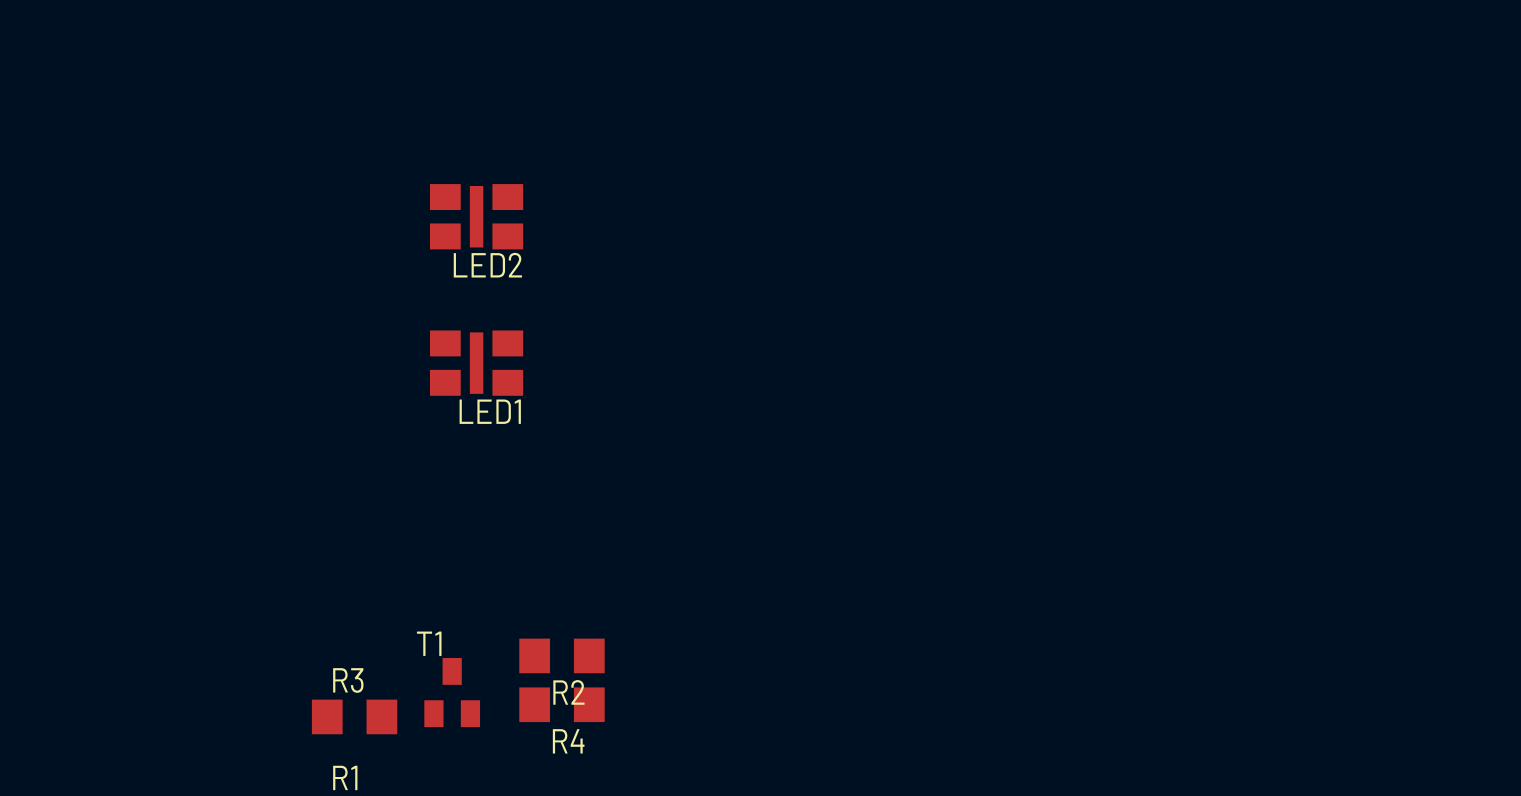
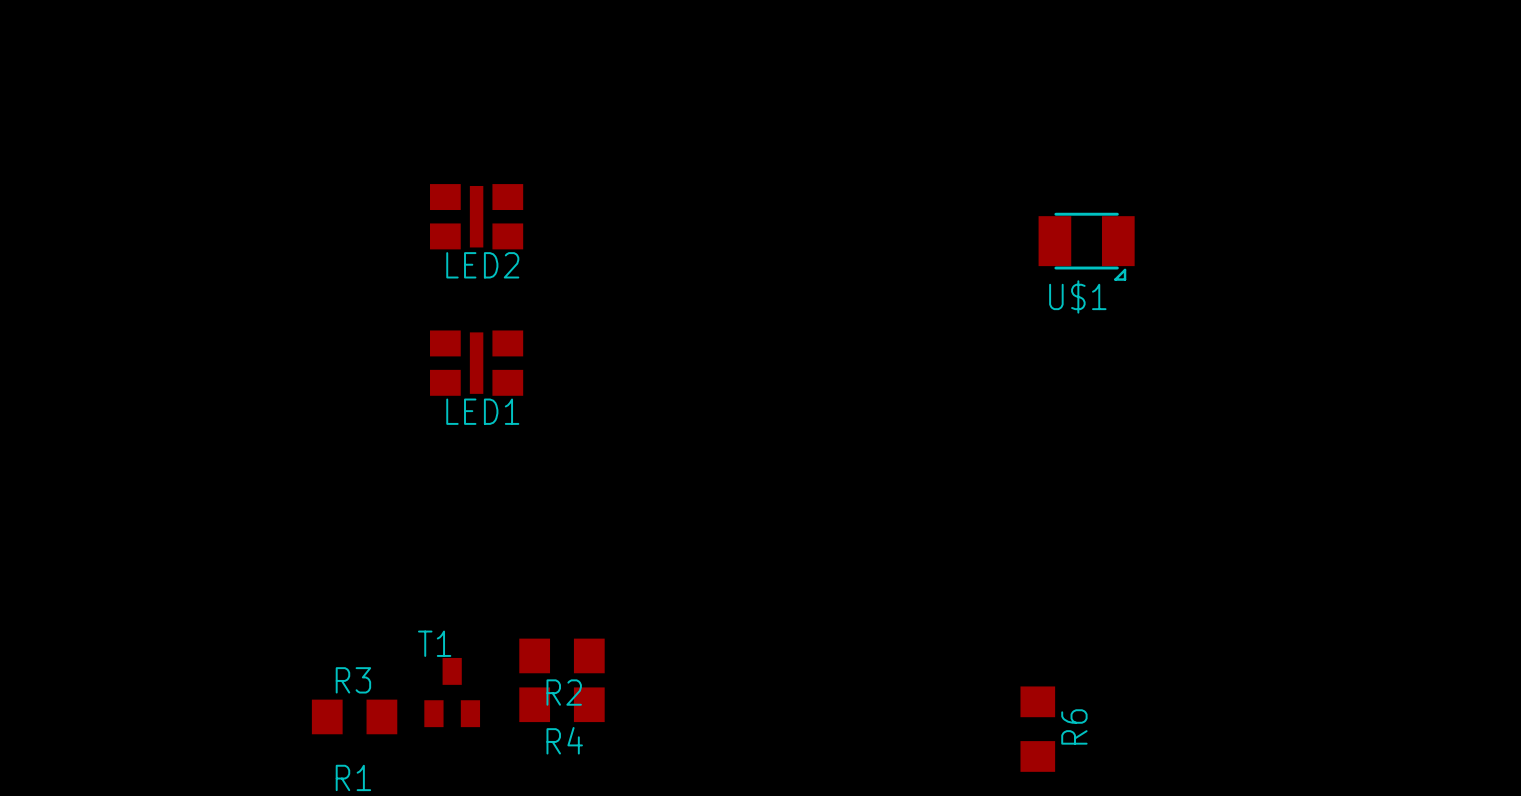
U$1: none -> (1086, 246)
R6: none -> (1037, 729)

